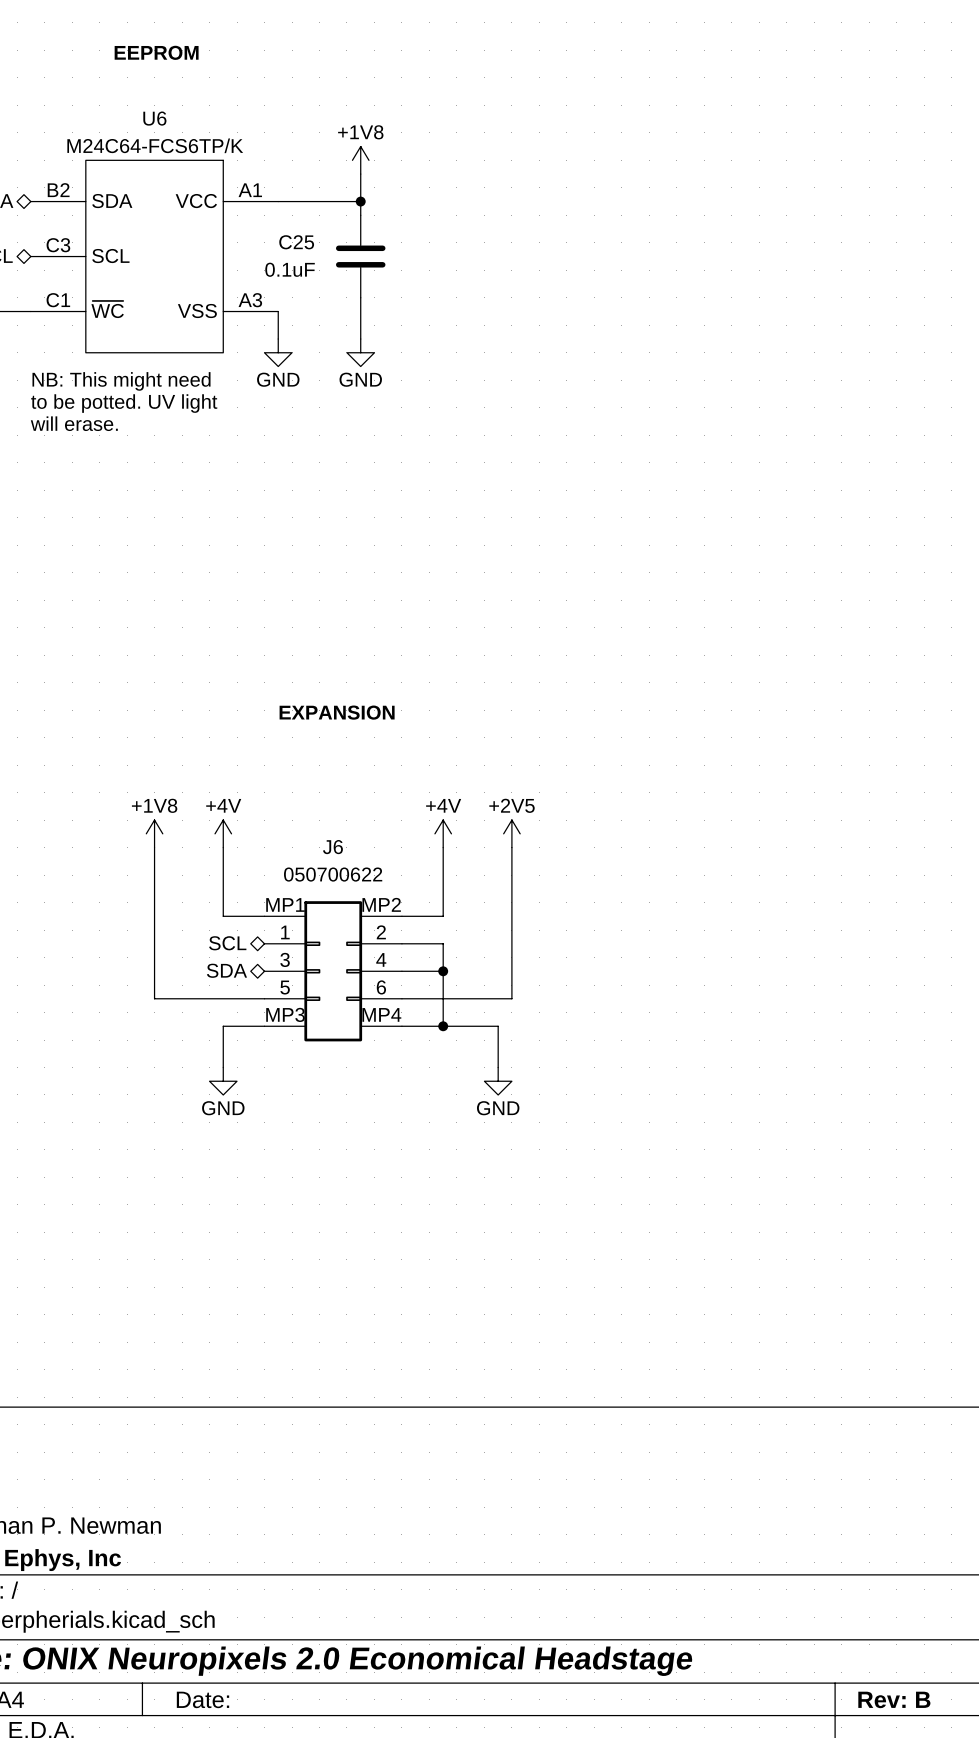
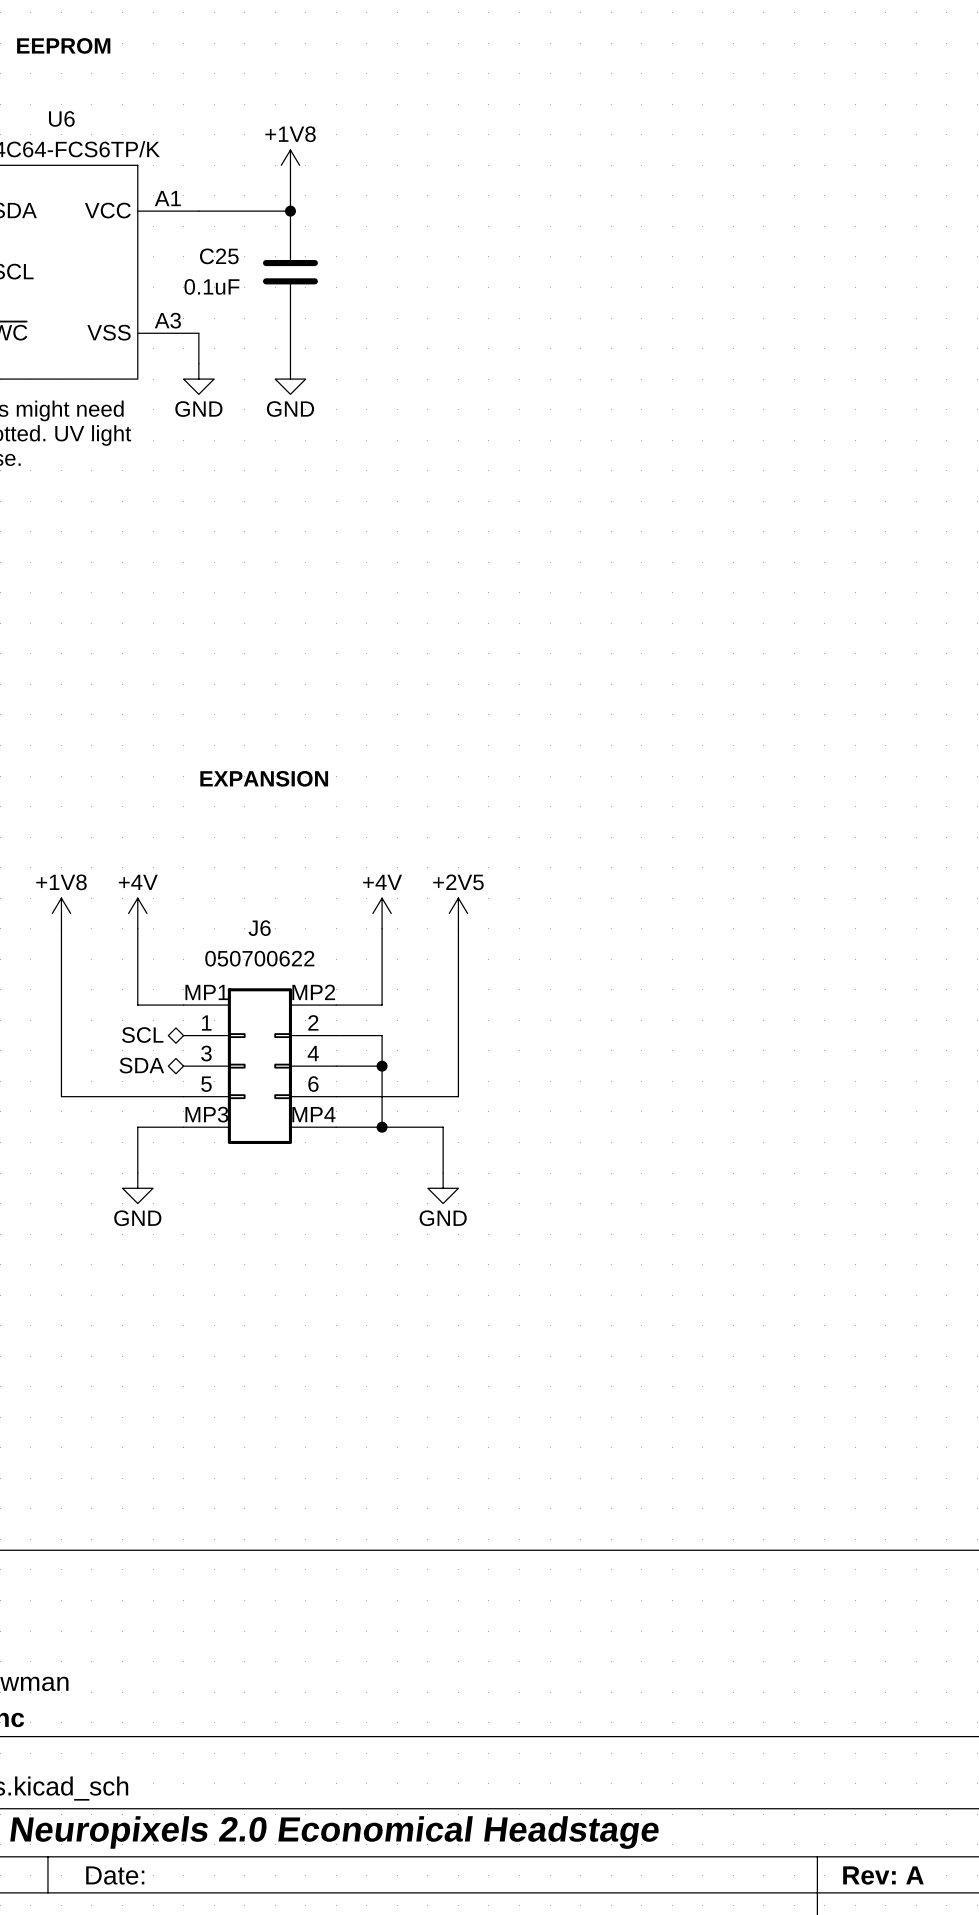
title block: Rev: B (894, 1699) -> Rev: A (883, 1875)

